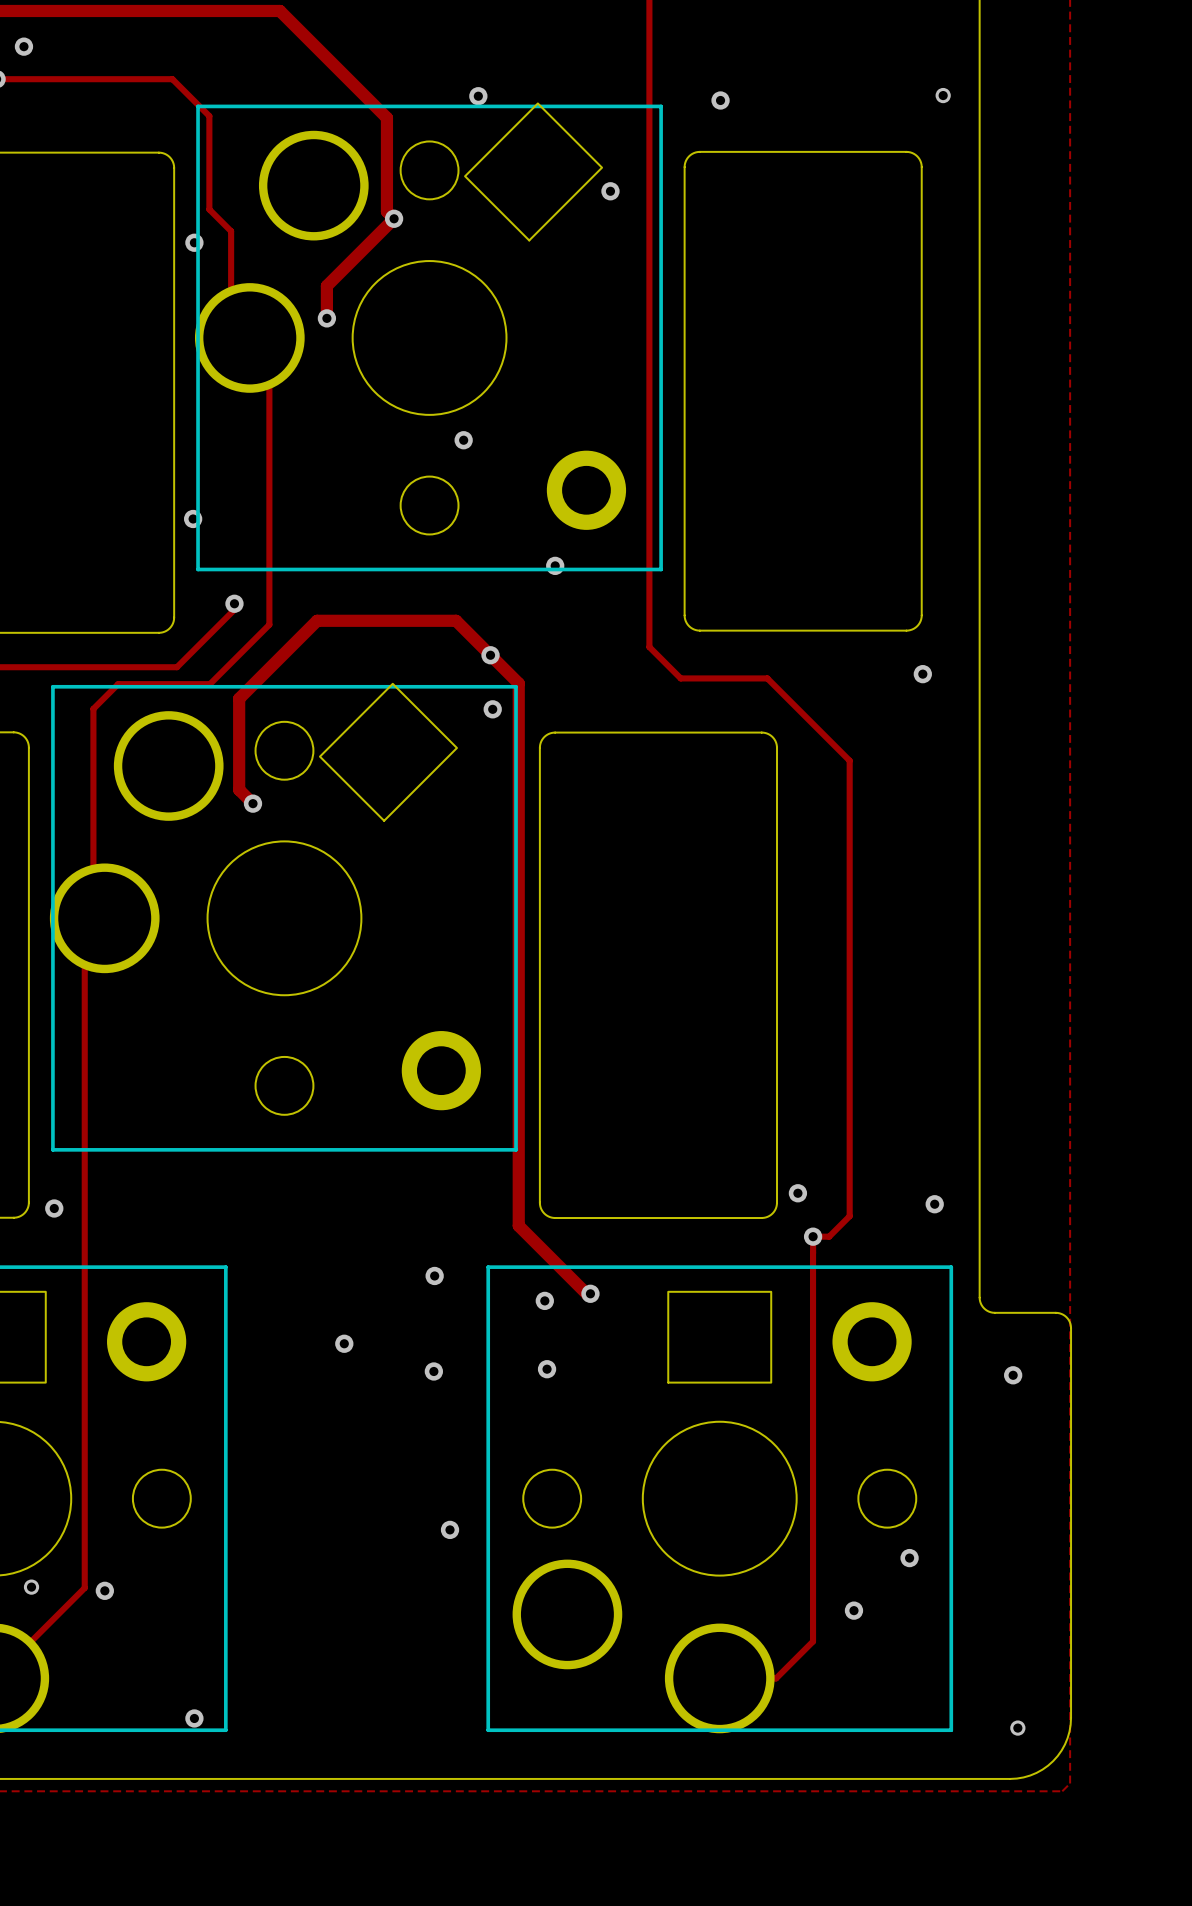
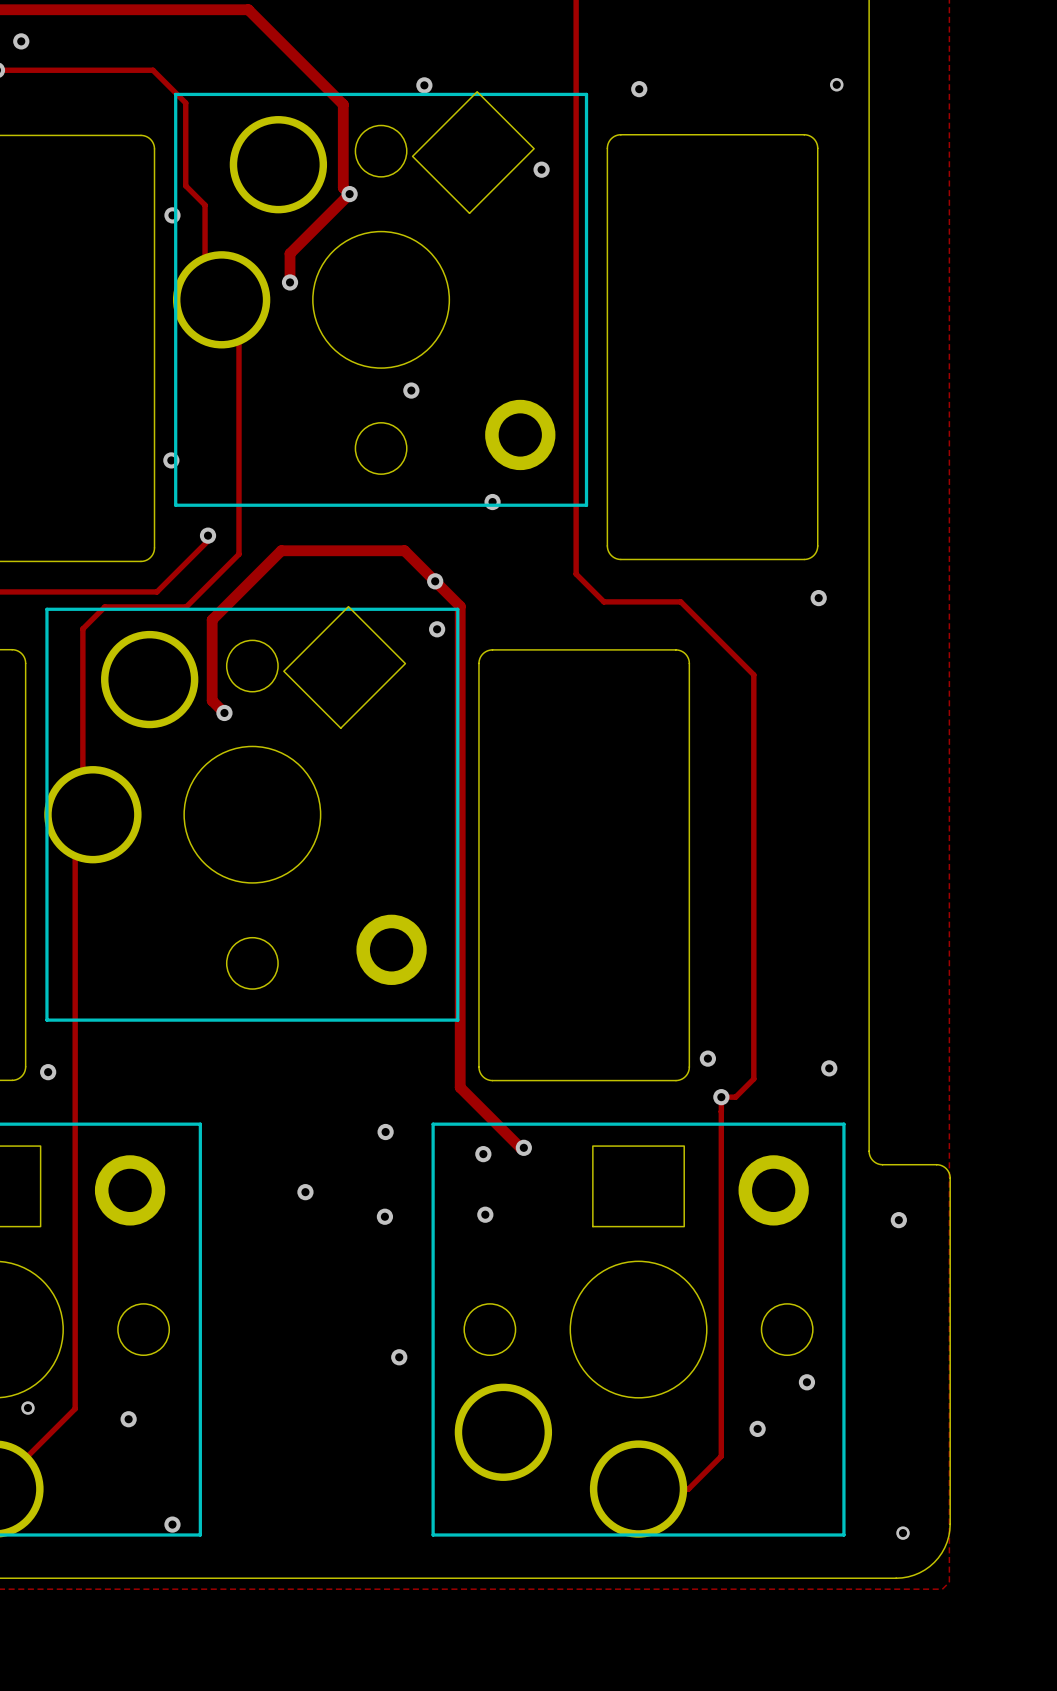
via position: (104, 1590) -> (128, 1419)

